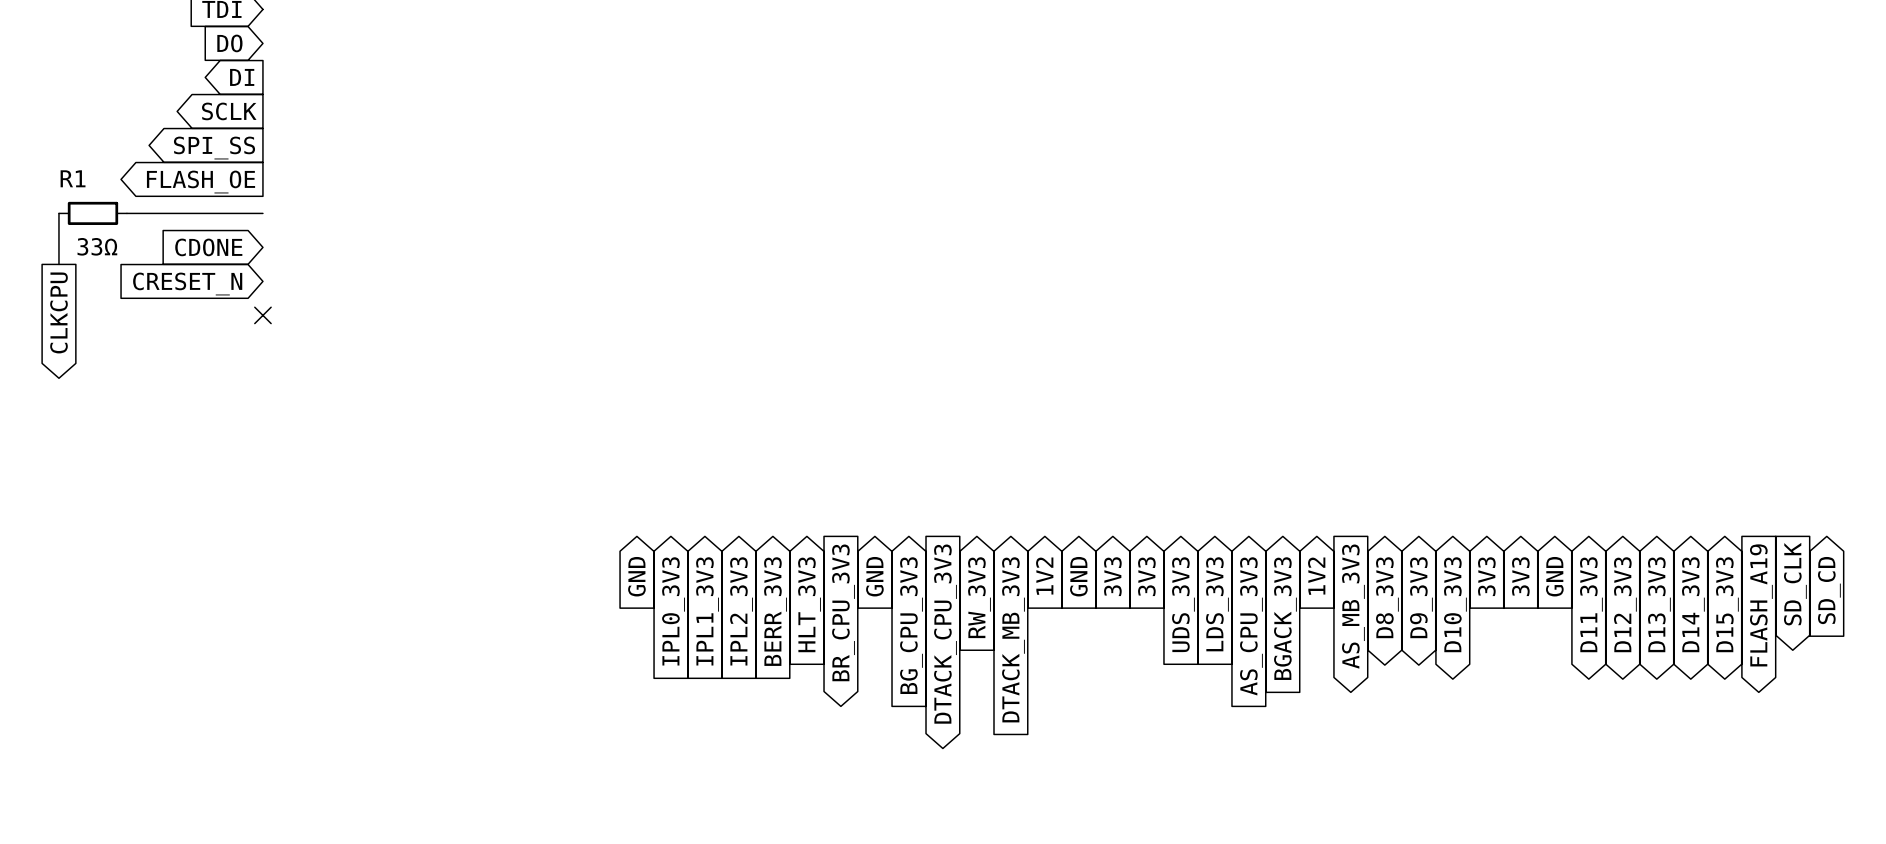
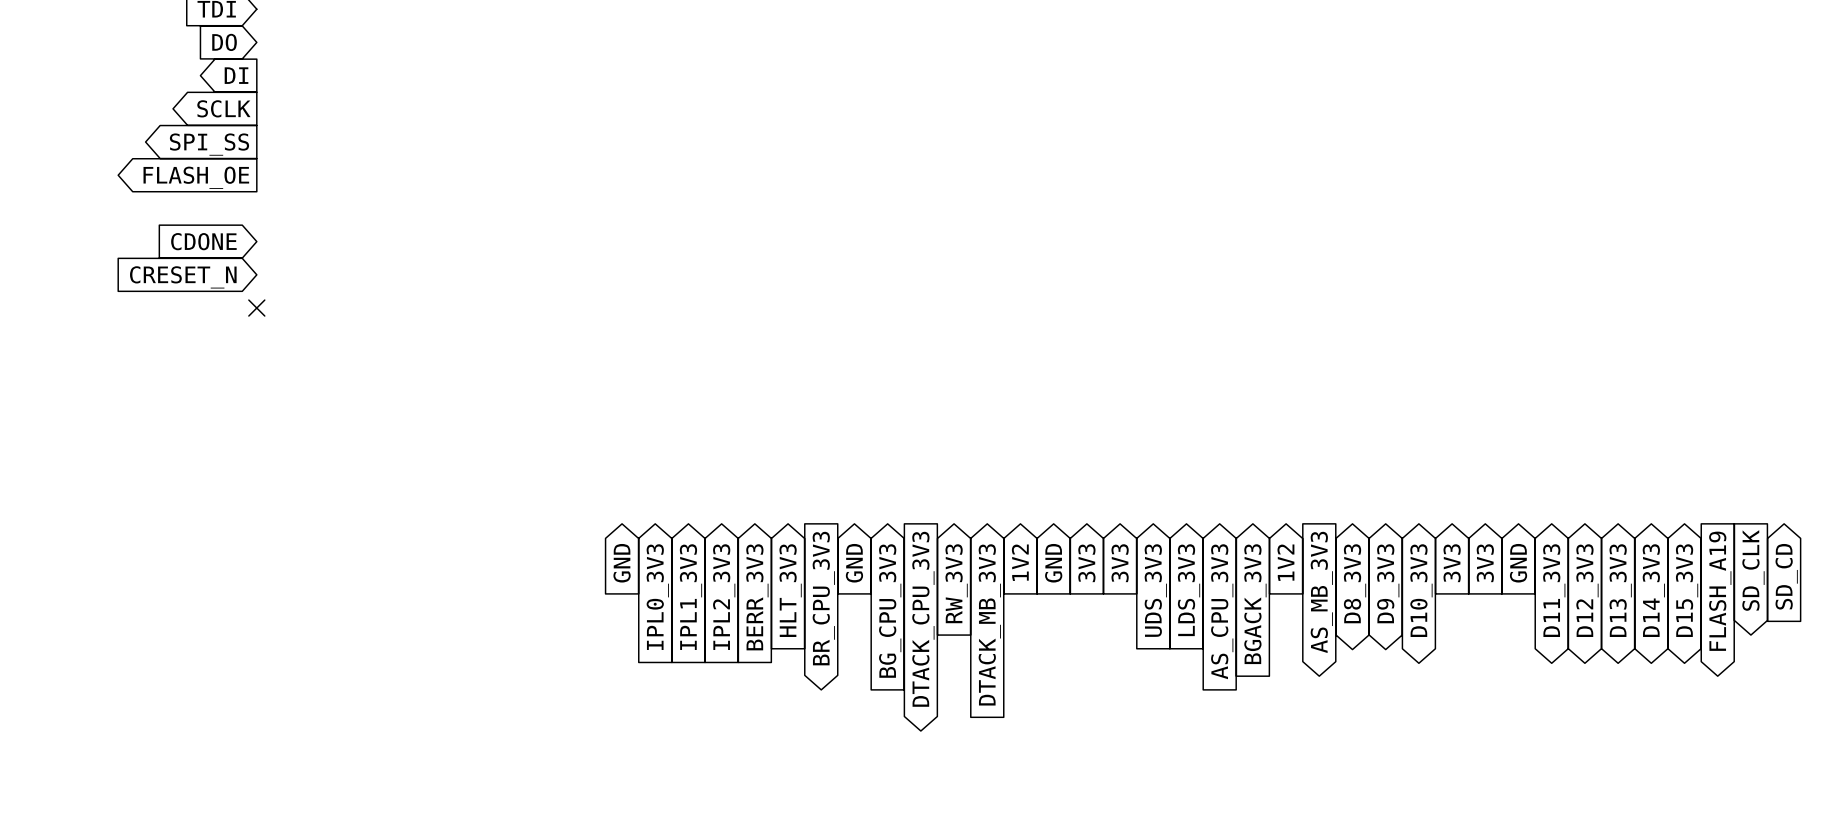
wire: (58, 213) (58, 264) -> none
R1: 33Ω (92, 213) -> none
wire: (126, 213) (262, 213) -> none
global label: CLKCPU (58, 312) -> none

